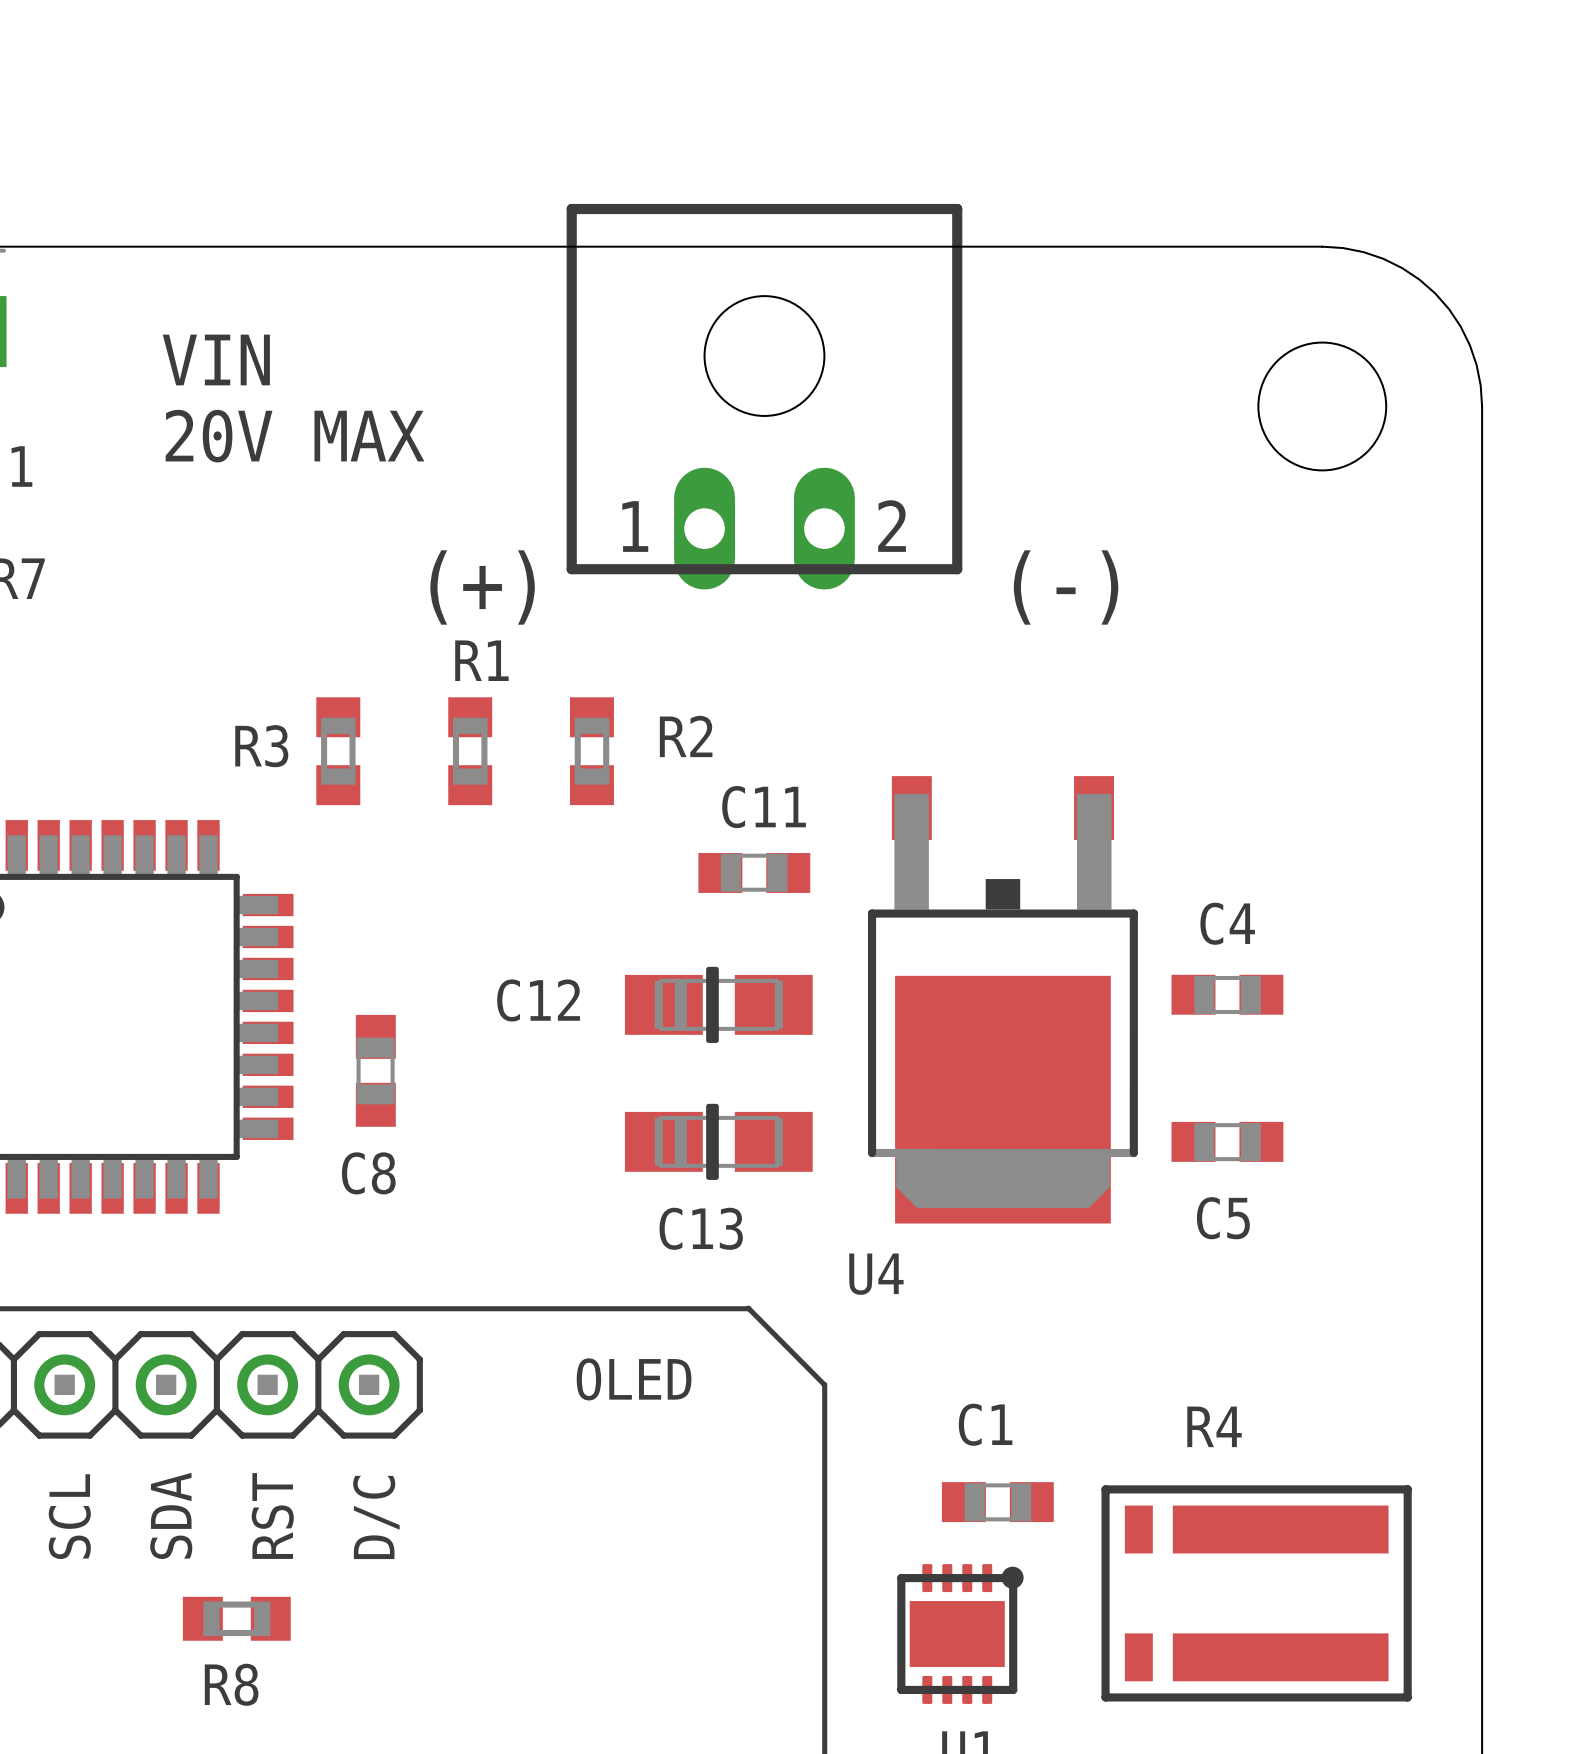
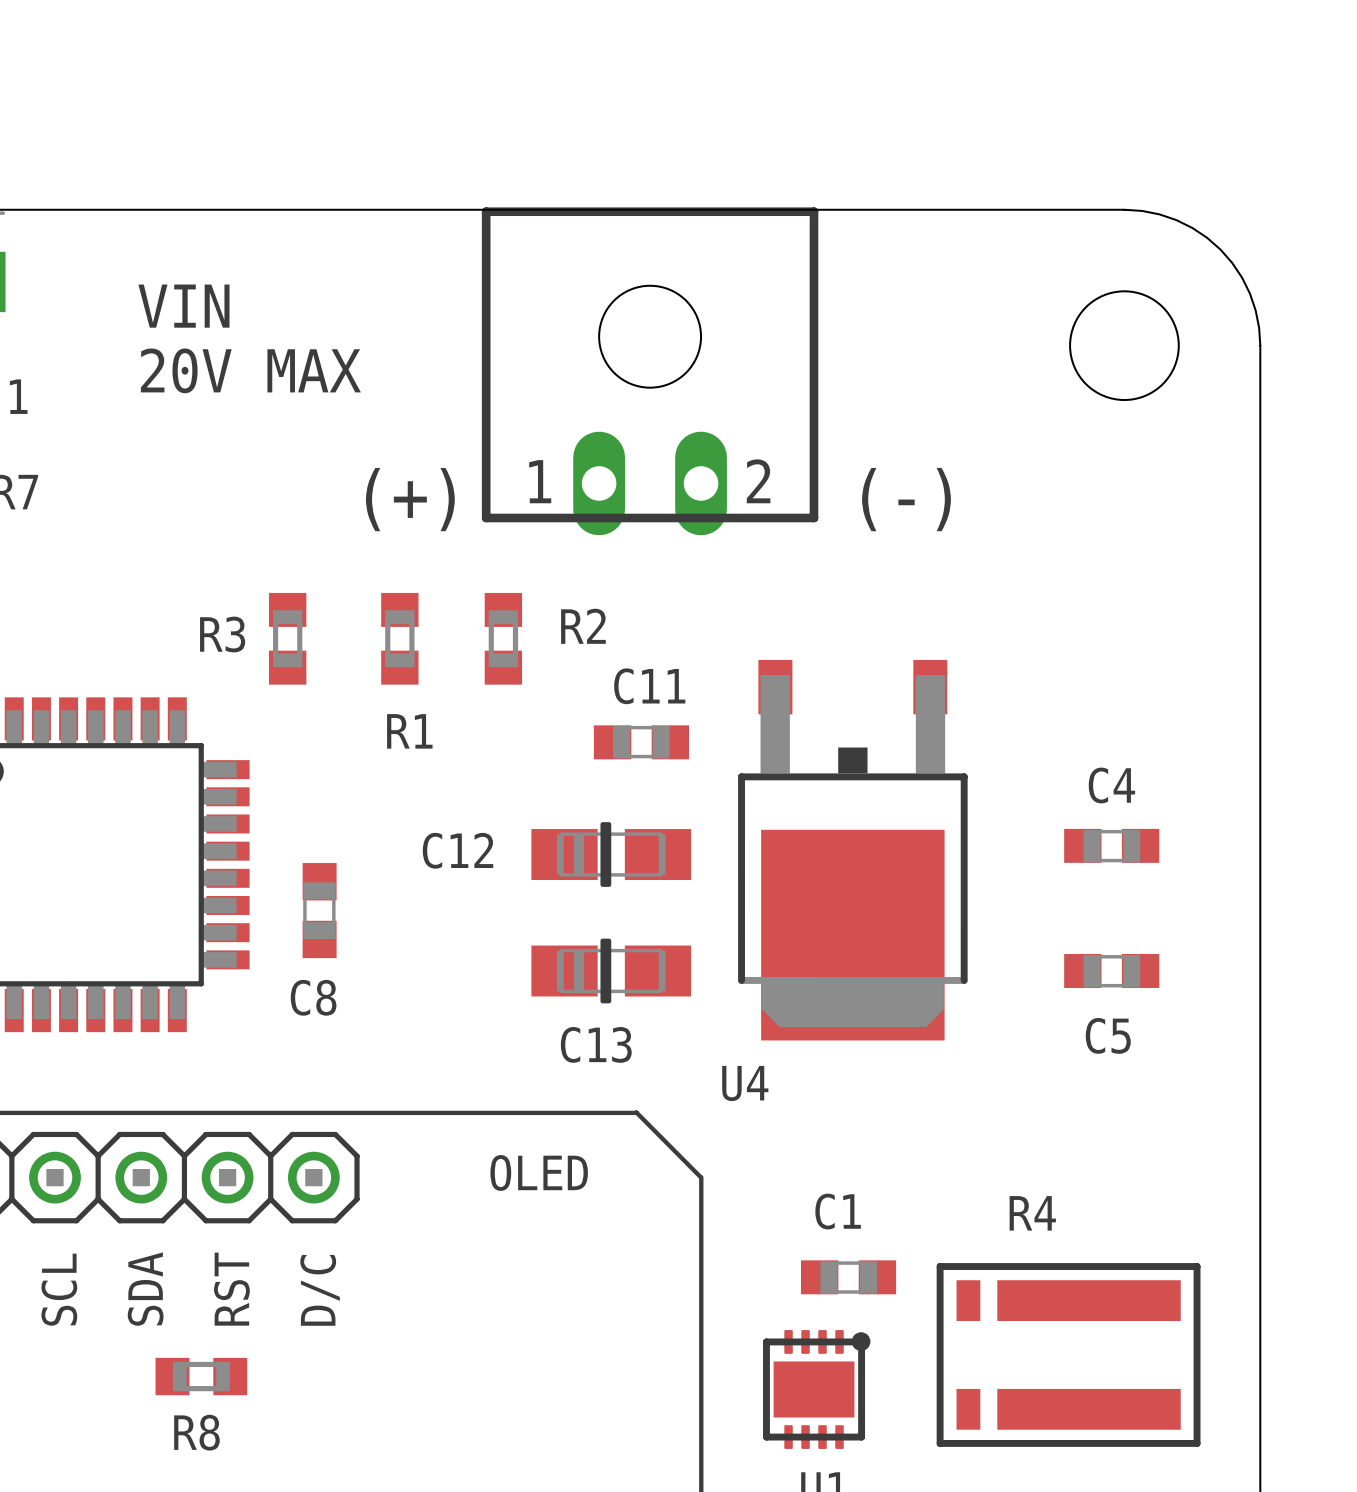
part position: (764, 396) -> (650, 371)
R1 name position: R1 (481, 660) -> R1 (409, 731)
C4 position: (1227, 994) -> (1111, 845)
C5 position: (1227, 1141) -> (1111, 971)

